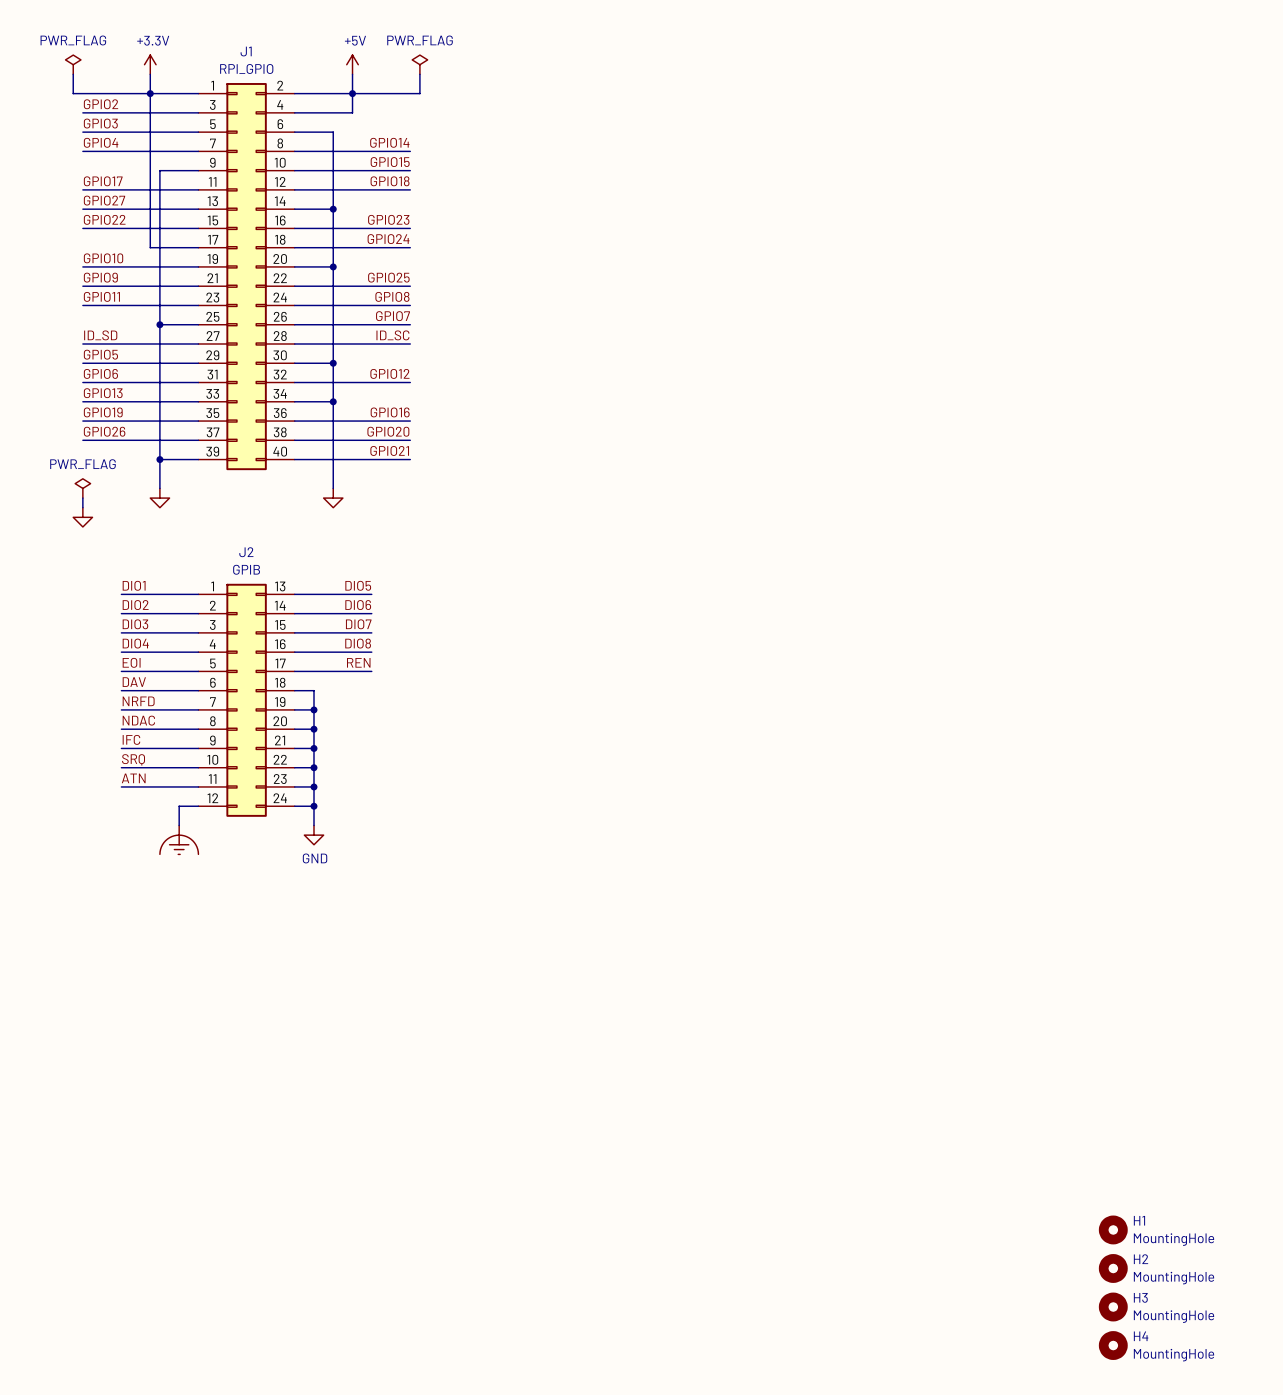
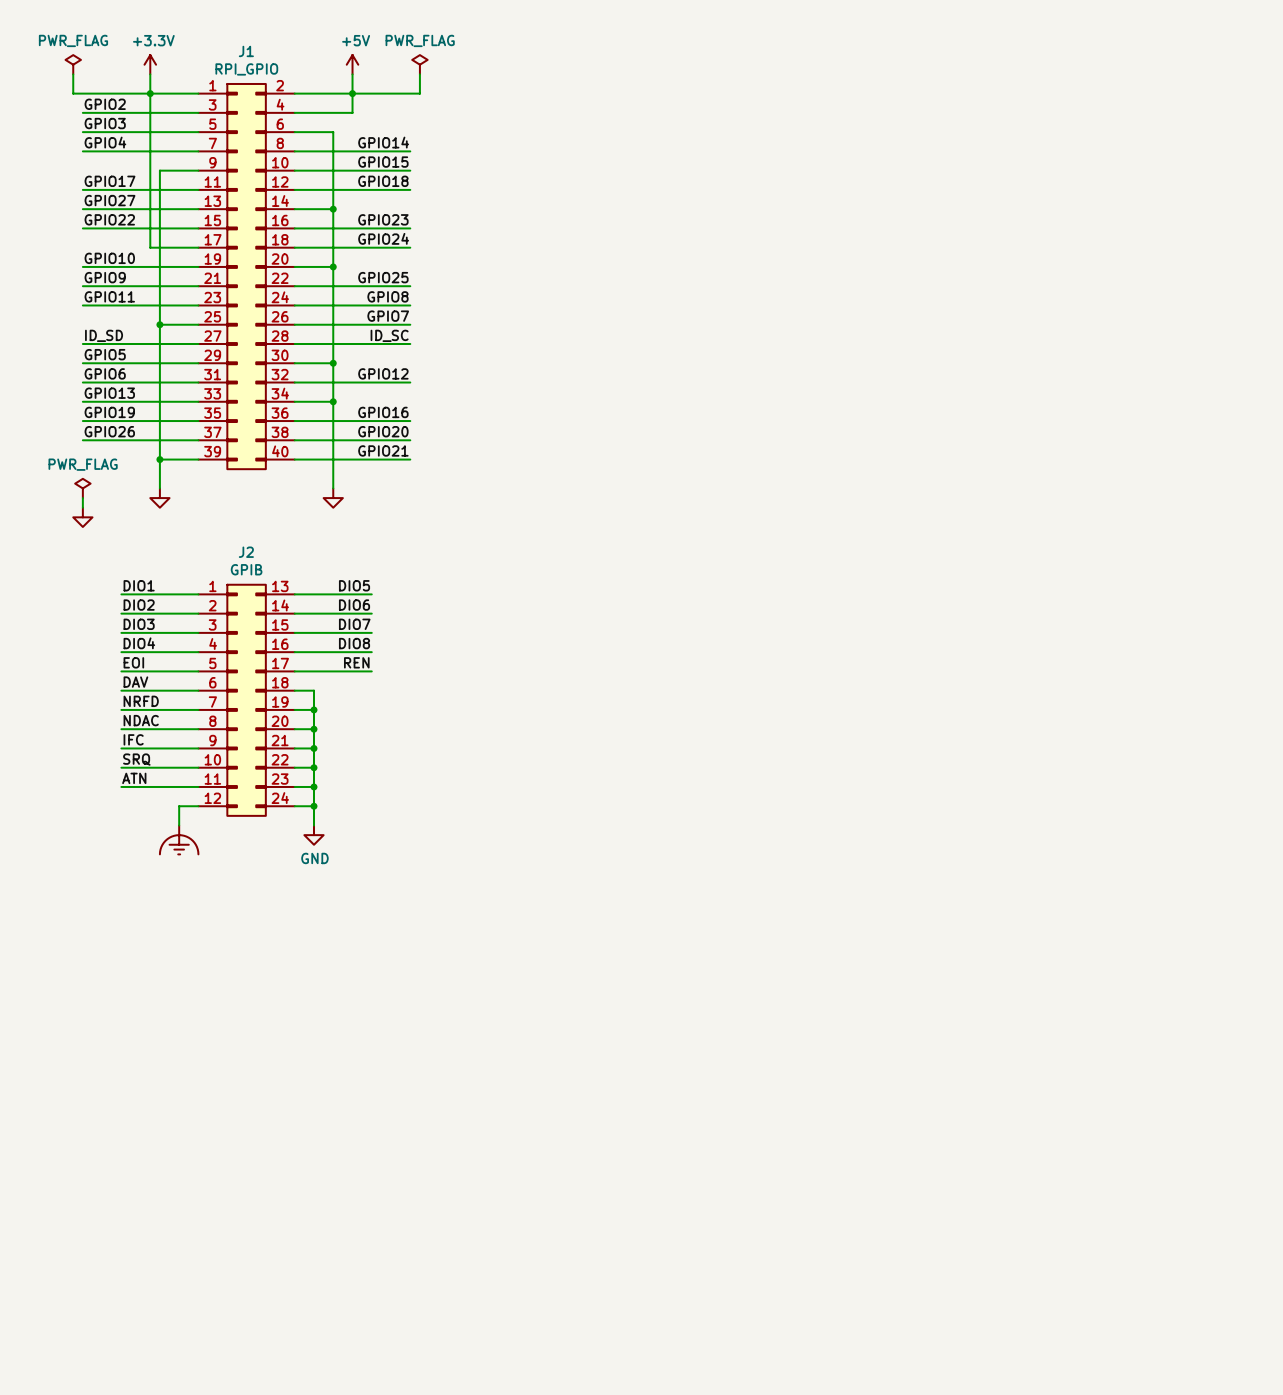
H1: MountingHole (1113, 1229) -> none
H2: MountingHole (1113, 1268) -> none
H3: MountingHole (1113, 1307) -> none
H4: MountingHole (1113, 1345) -> none

